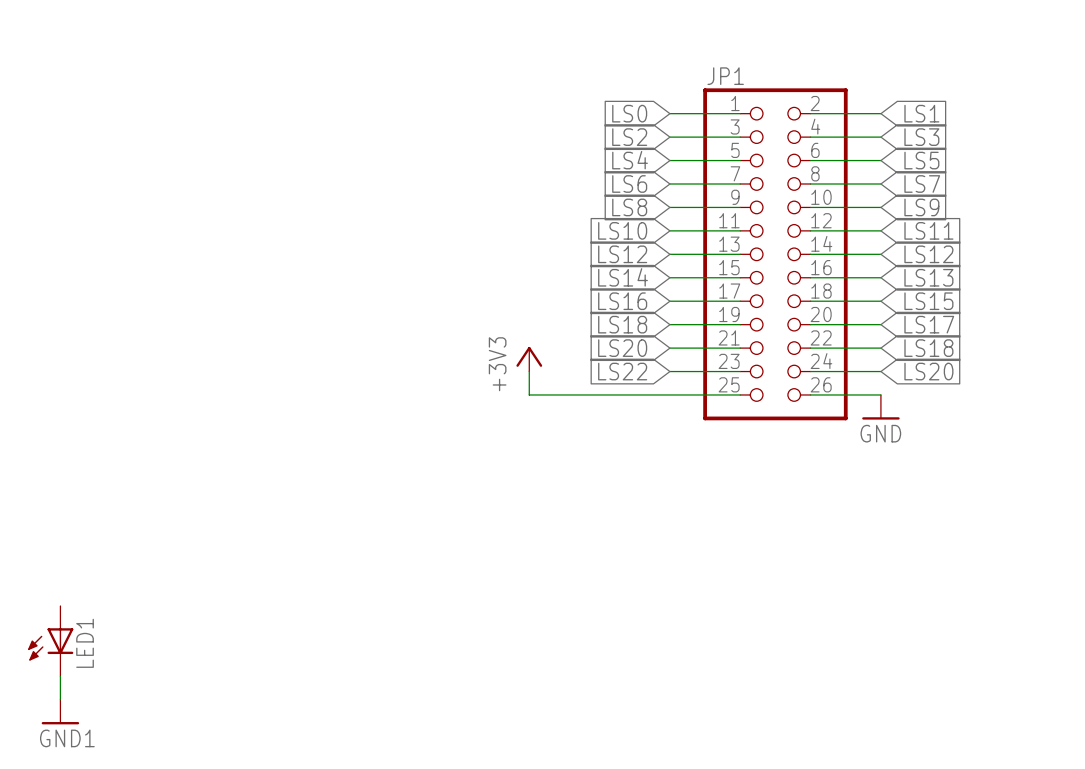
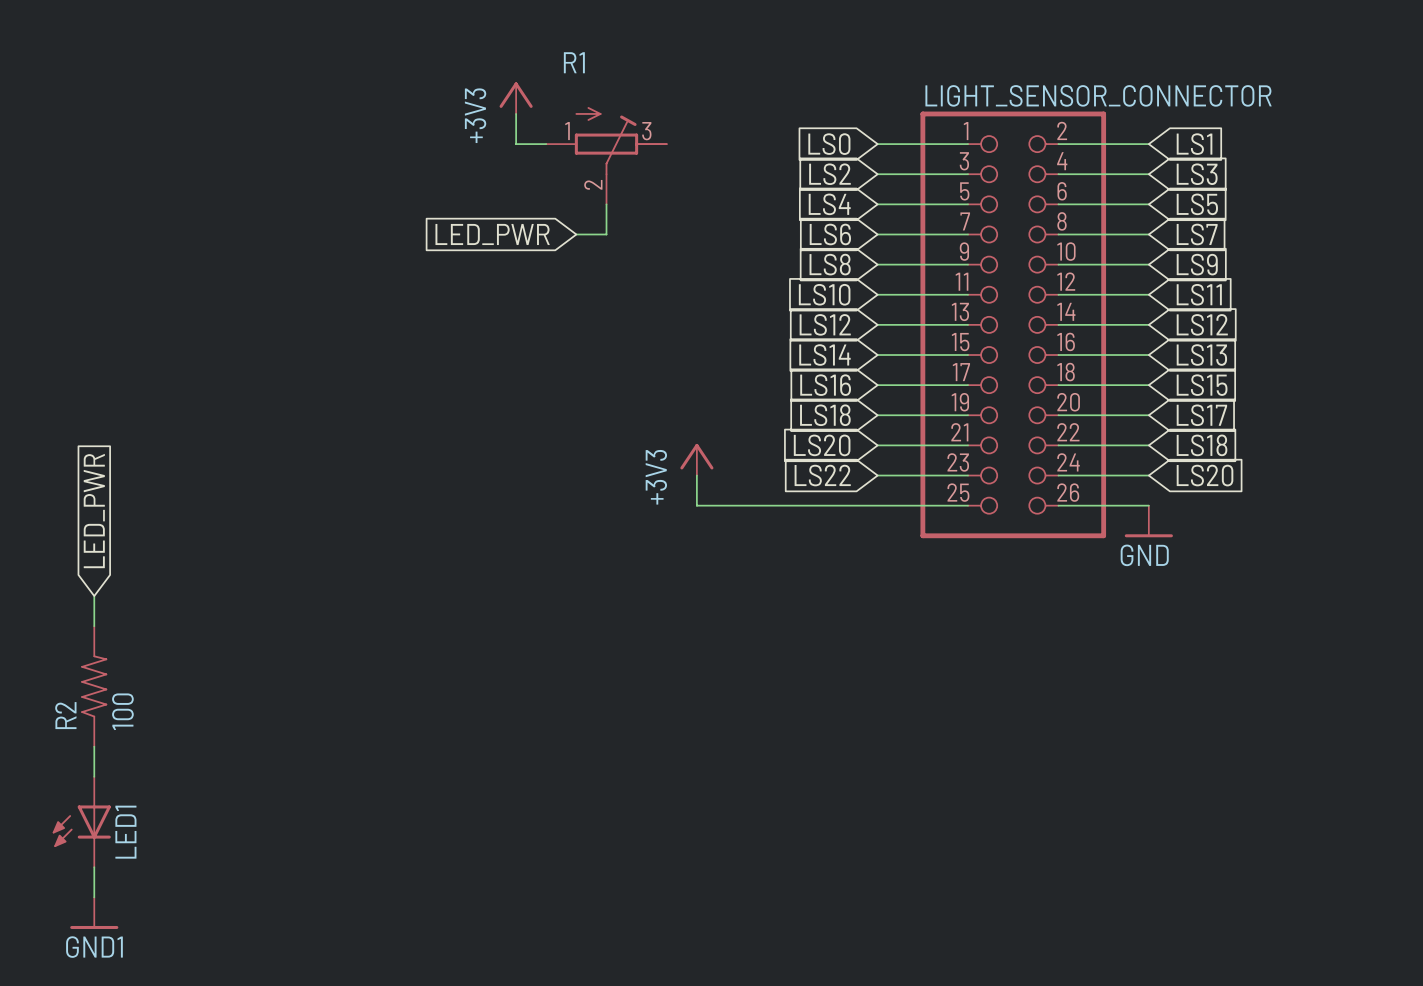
JP1 name: JP1 (725, 76) -> LIGHT_SENSOR_CONNECTOR (1098, 95)
power symbol: none -> +3V3 (516, 98)
wire: none -> (516, 113) (516, 144) (546, 144)
R1: none -> (606, 155)
wire: none -> (606, 204) (606, 234) (576, 234)
global label: none -> LED_PWR (492, 234)
global label: none -> LED_PWR (94, 511)
wire: none -> (94, 596) (94, 626)
R2: none -> 100 (94, 686)
wire: none -> (94, 746) (94, 776)

